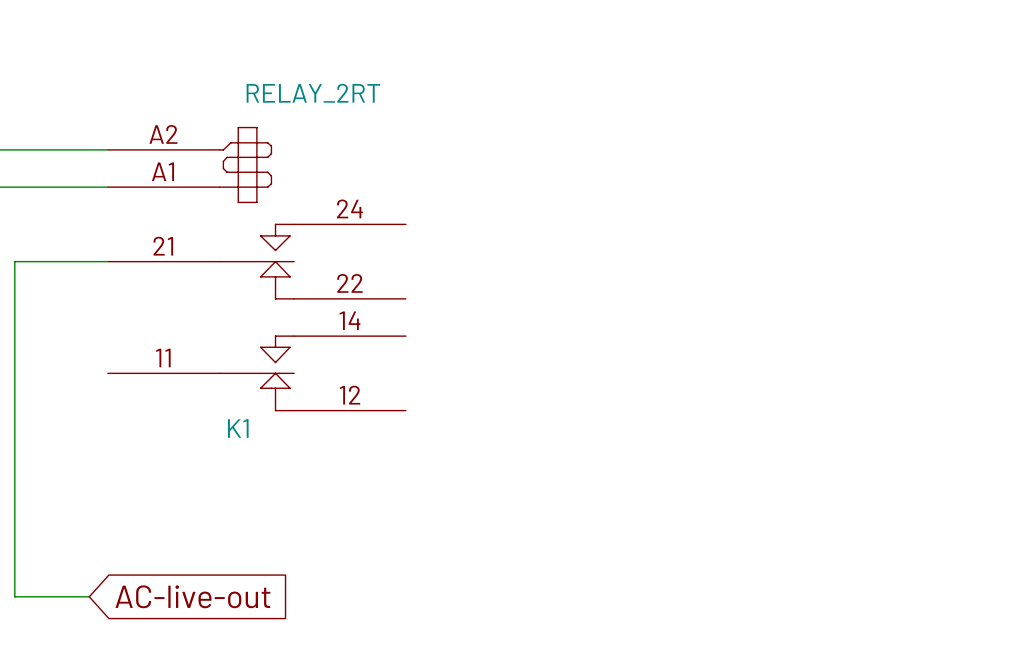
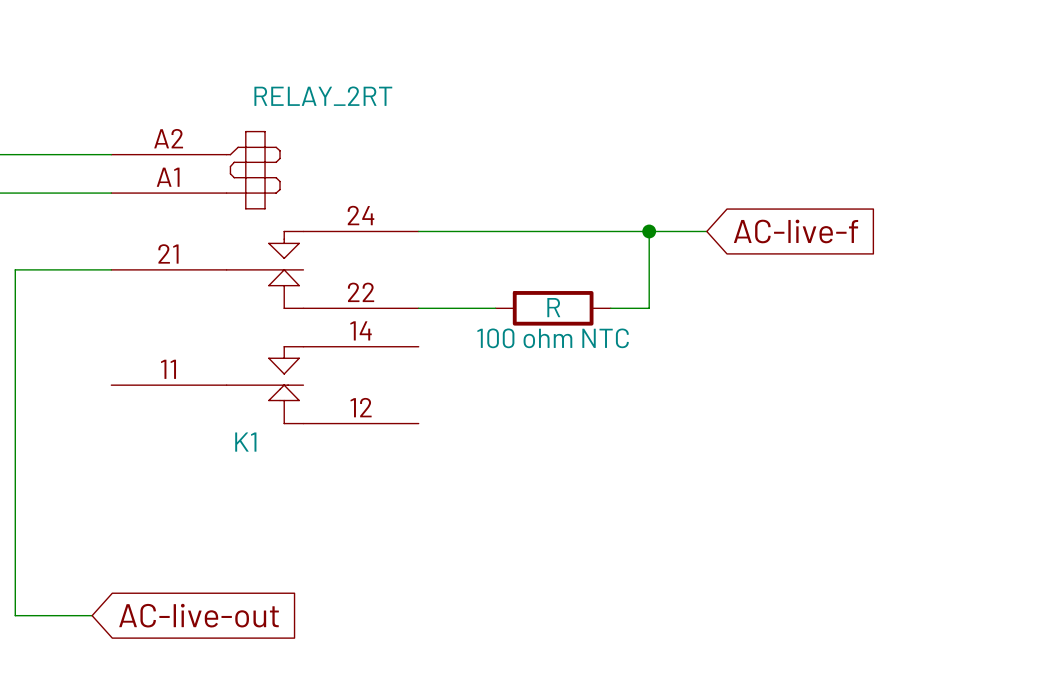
wire: none -> (418, 231) (706, 231)
wire: none -> (649, 231) (649, 308) (610, 308)
junction: none -> (649, 231)
global label: none -> AC-live-f (796, 231)
wire: none -> (418, 308) (495, 308)
100 ohm NTC: none -> R (553, 308)

